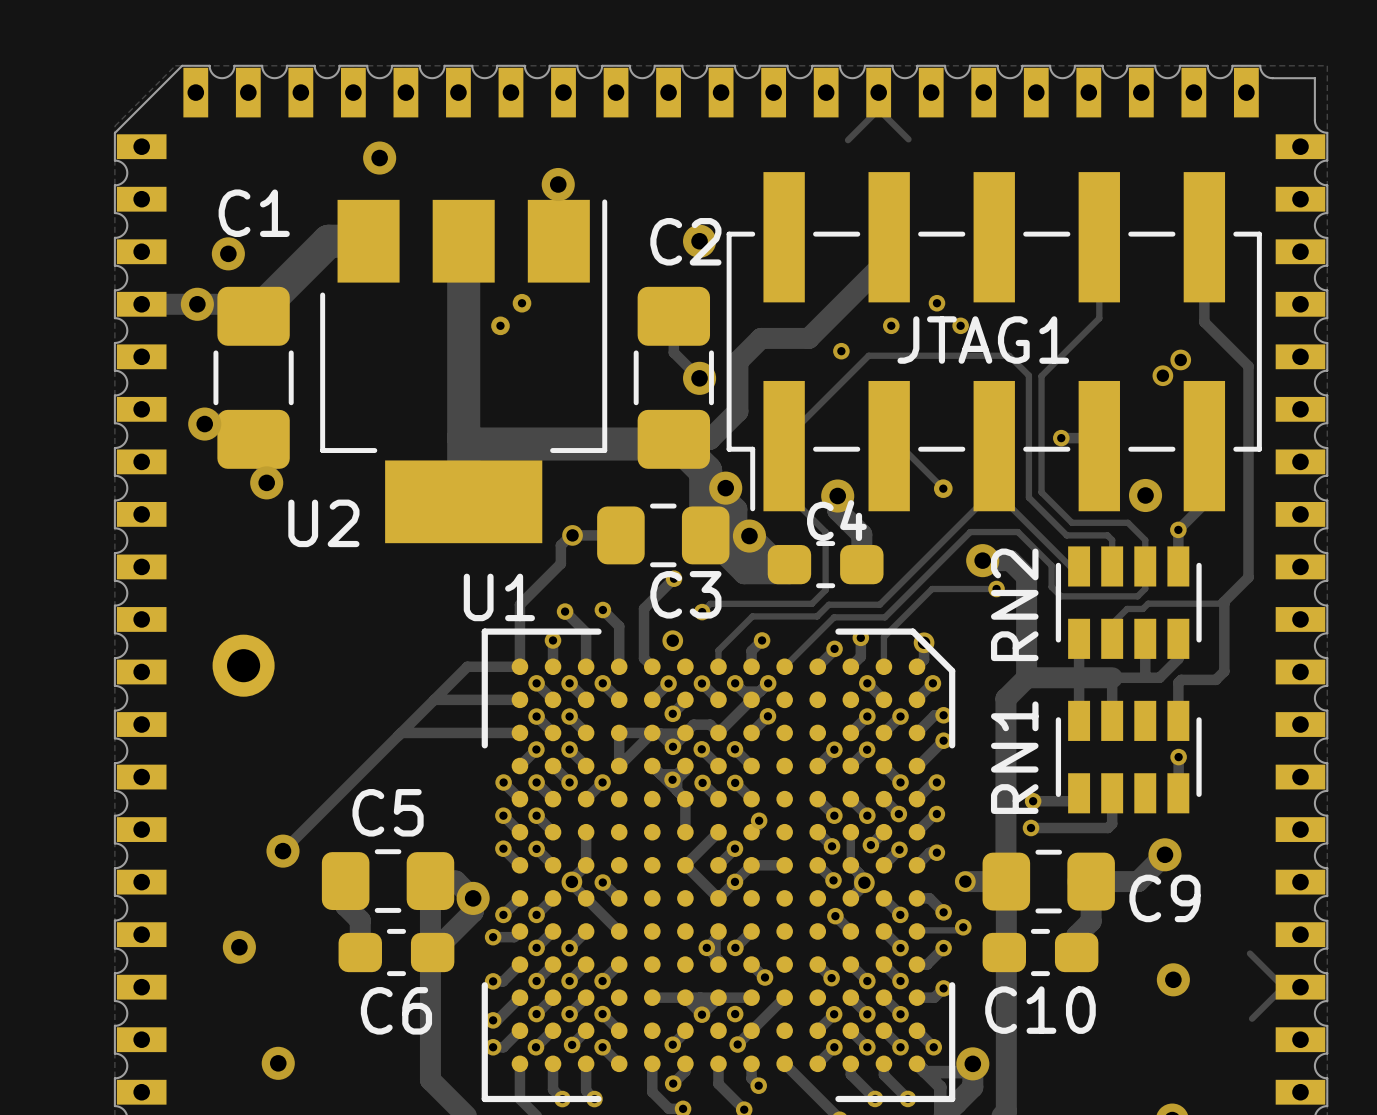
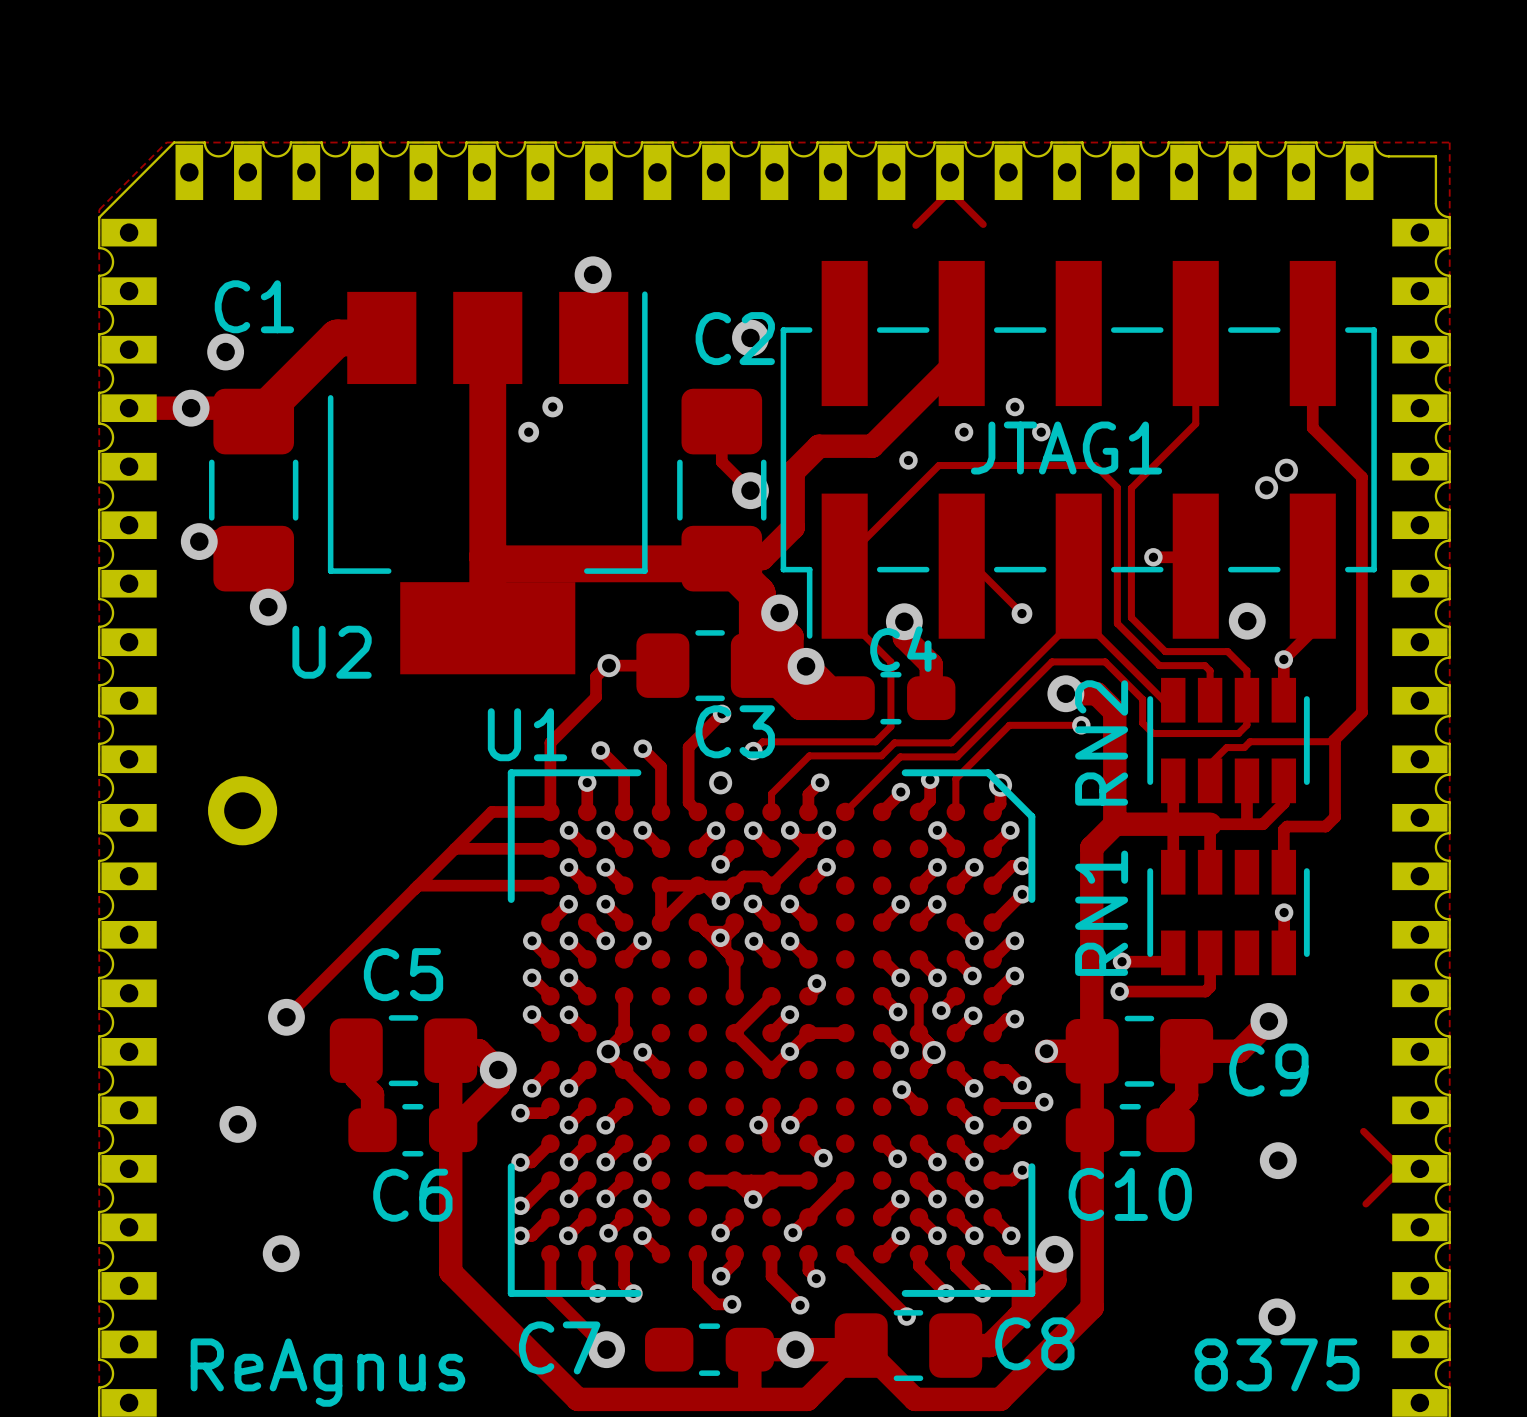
via: (379, 158) -> none
via: (735, 1014) -> none

